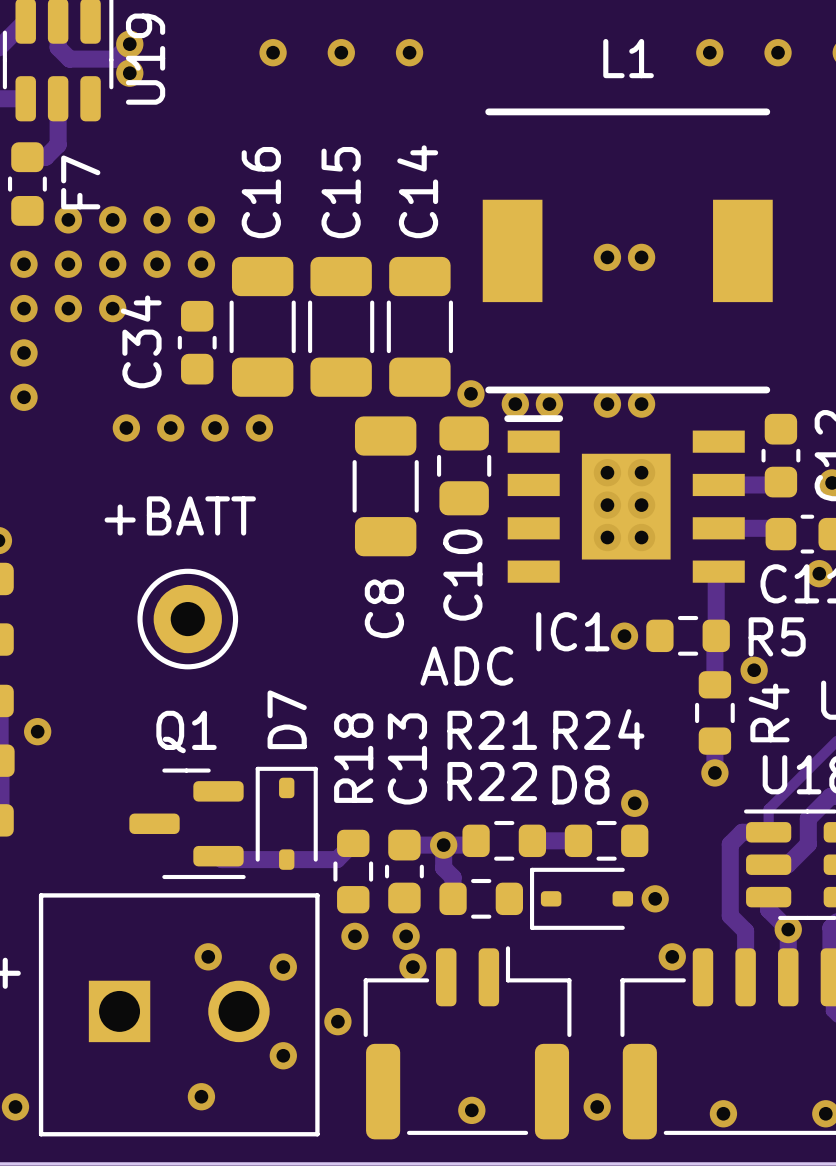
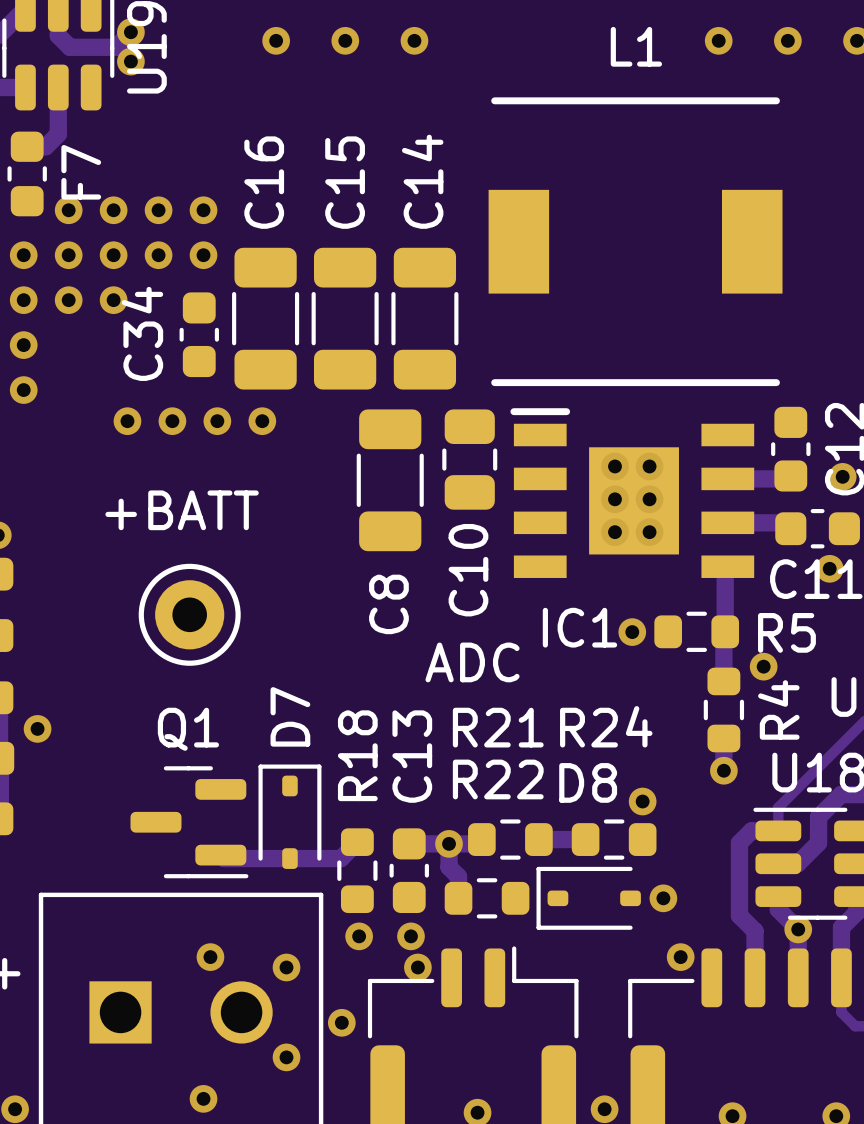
via: (607, 257) -> none
via: (641, 257) -> none
via: (470, 393) -> none
via: (515, 404) -> none
via: (549, 404) -> none
via: (607, 404) -> none
via: (641, 404) -> none

